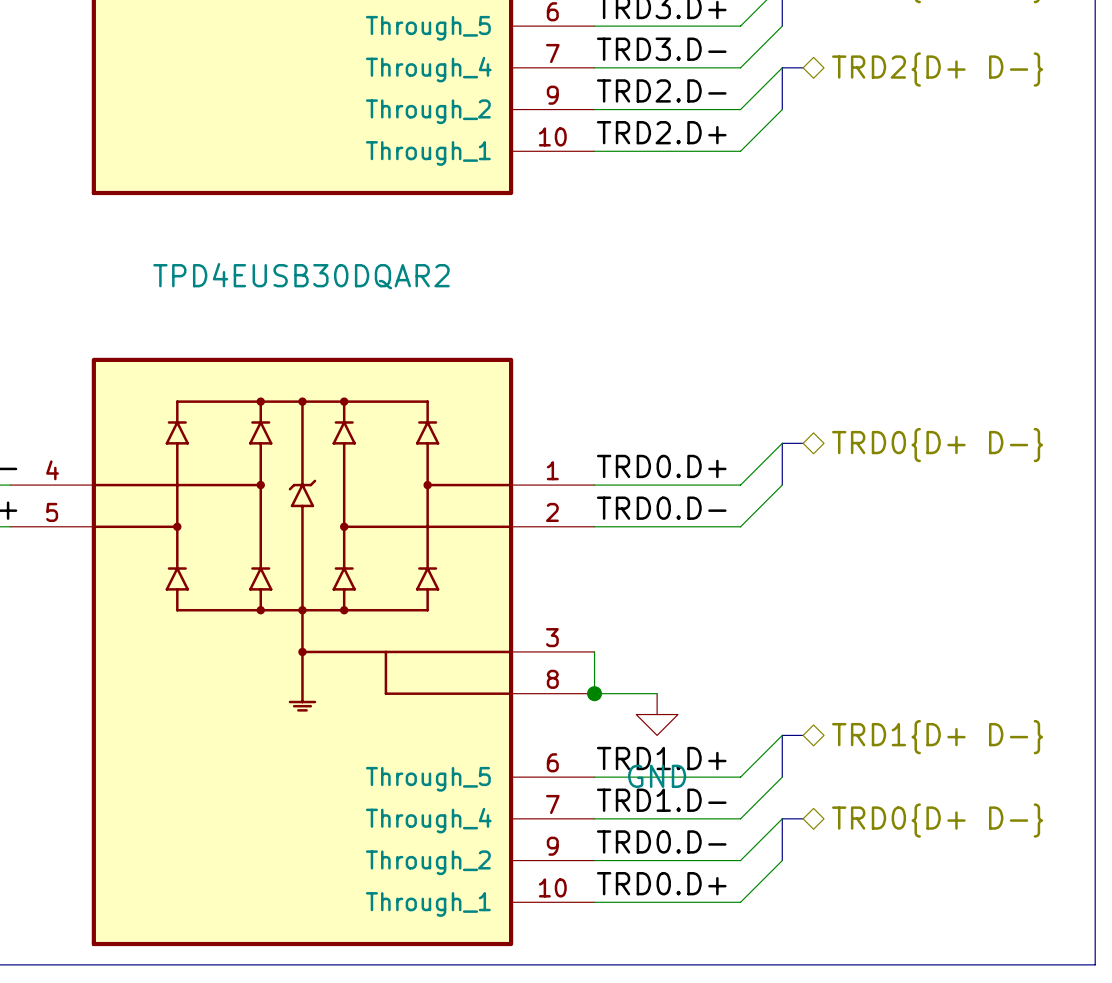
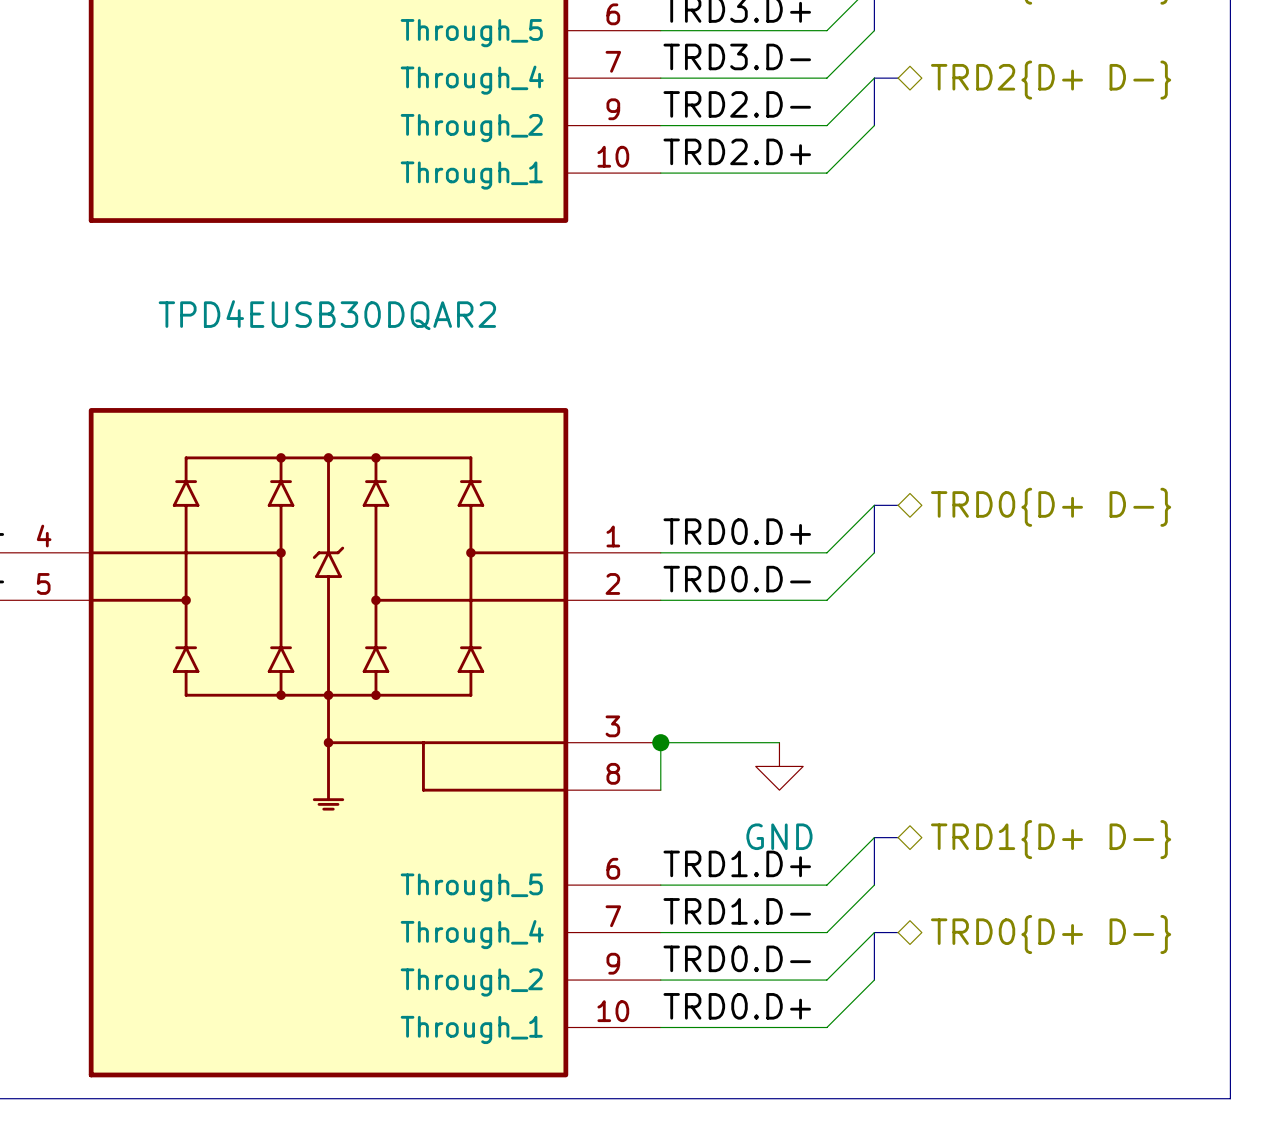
wire: none -> (660, 742) (779, 742)
wire: (594, 693) (657, 693) -> none
junction position: (594, 693) -> (660, 742)
power symbol position: GND (657, 714) -> GND (779, 766)

